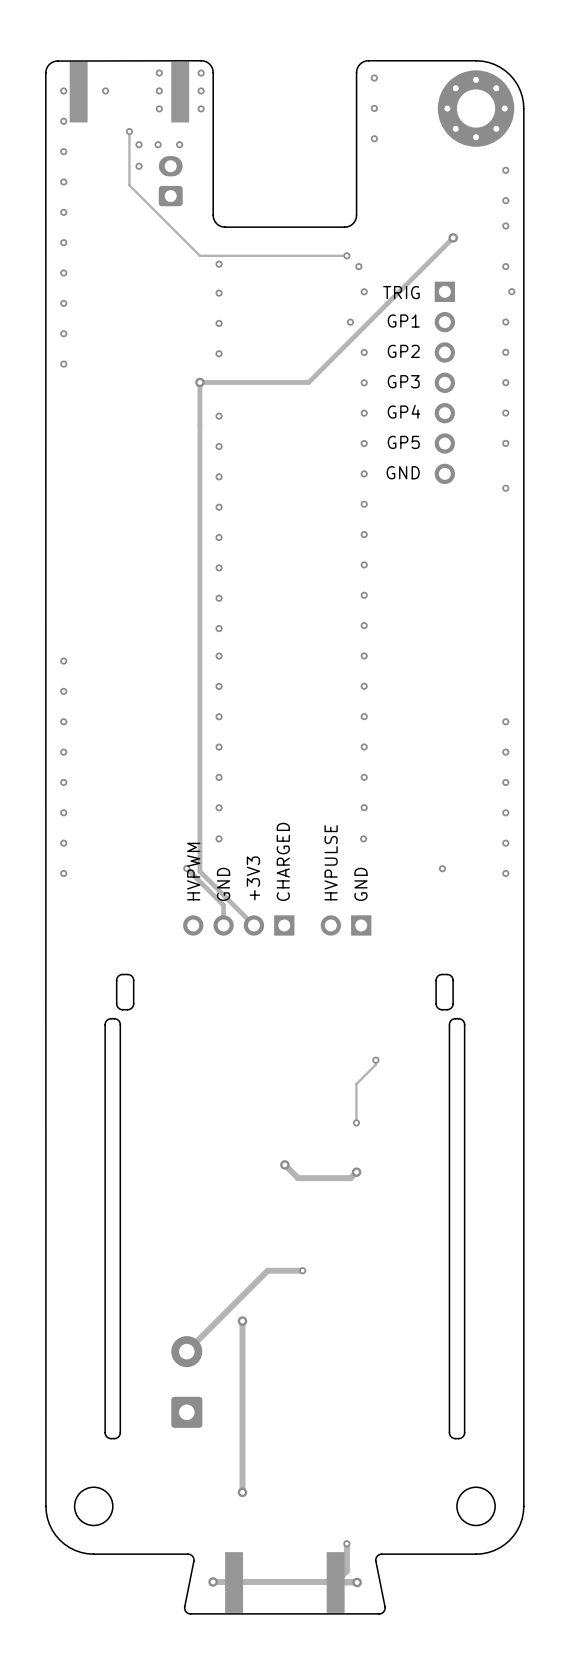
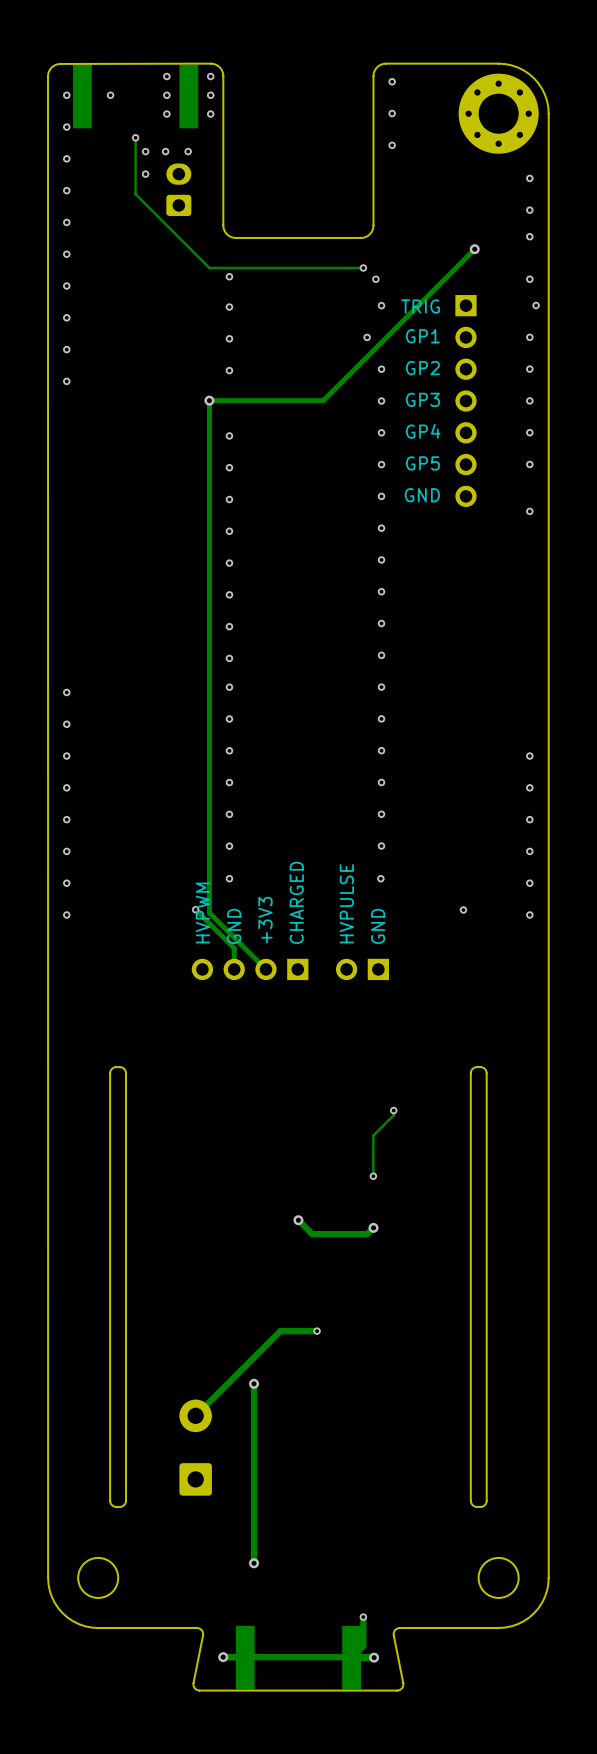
board edge: (127, 974) (120, 974) (116, 979) (116, 1004) (121, 1009) (129, 1009) (133, 1004) (133, 979) (127, 974) -> none
board edge: (447, 974) (439, 975) (436, 979) (436, 1004) (440, 1009) (449, 1009) (452, 1005) (452, 979) (447, 974) -> none

